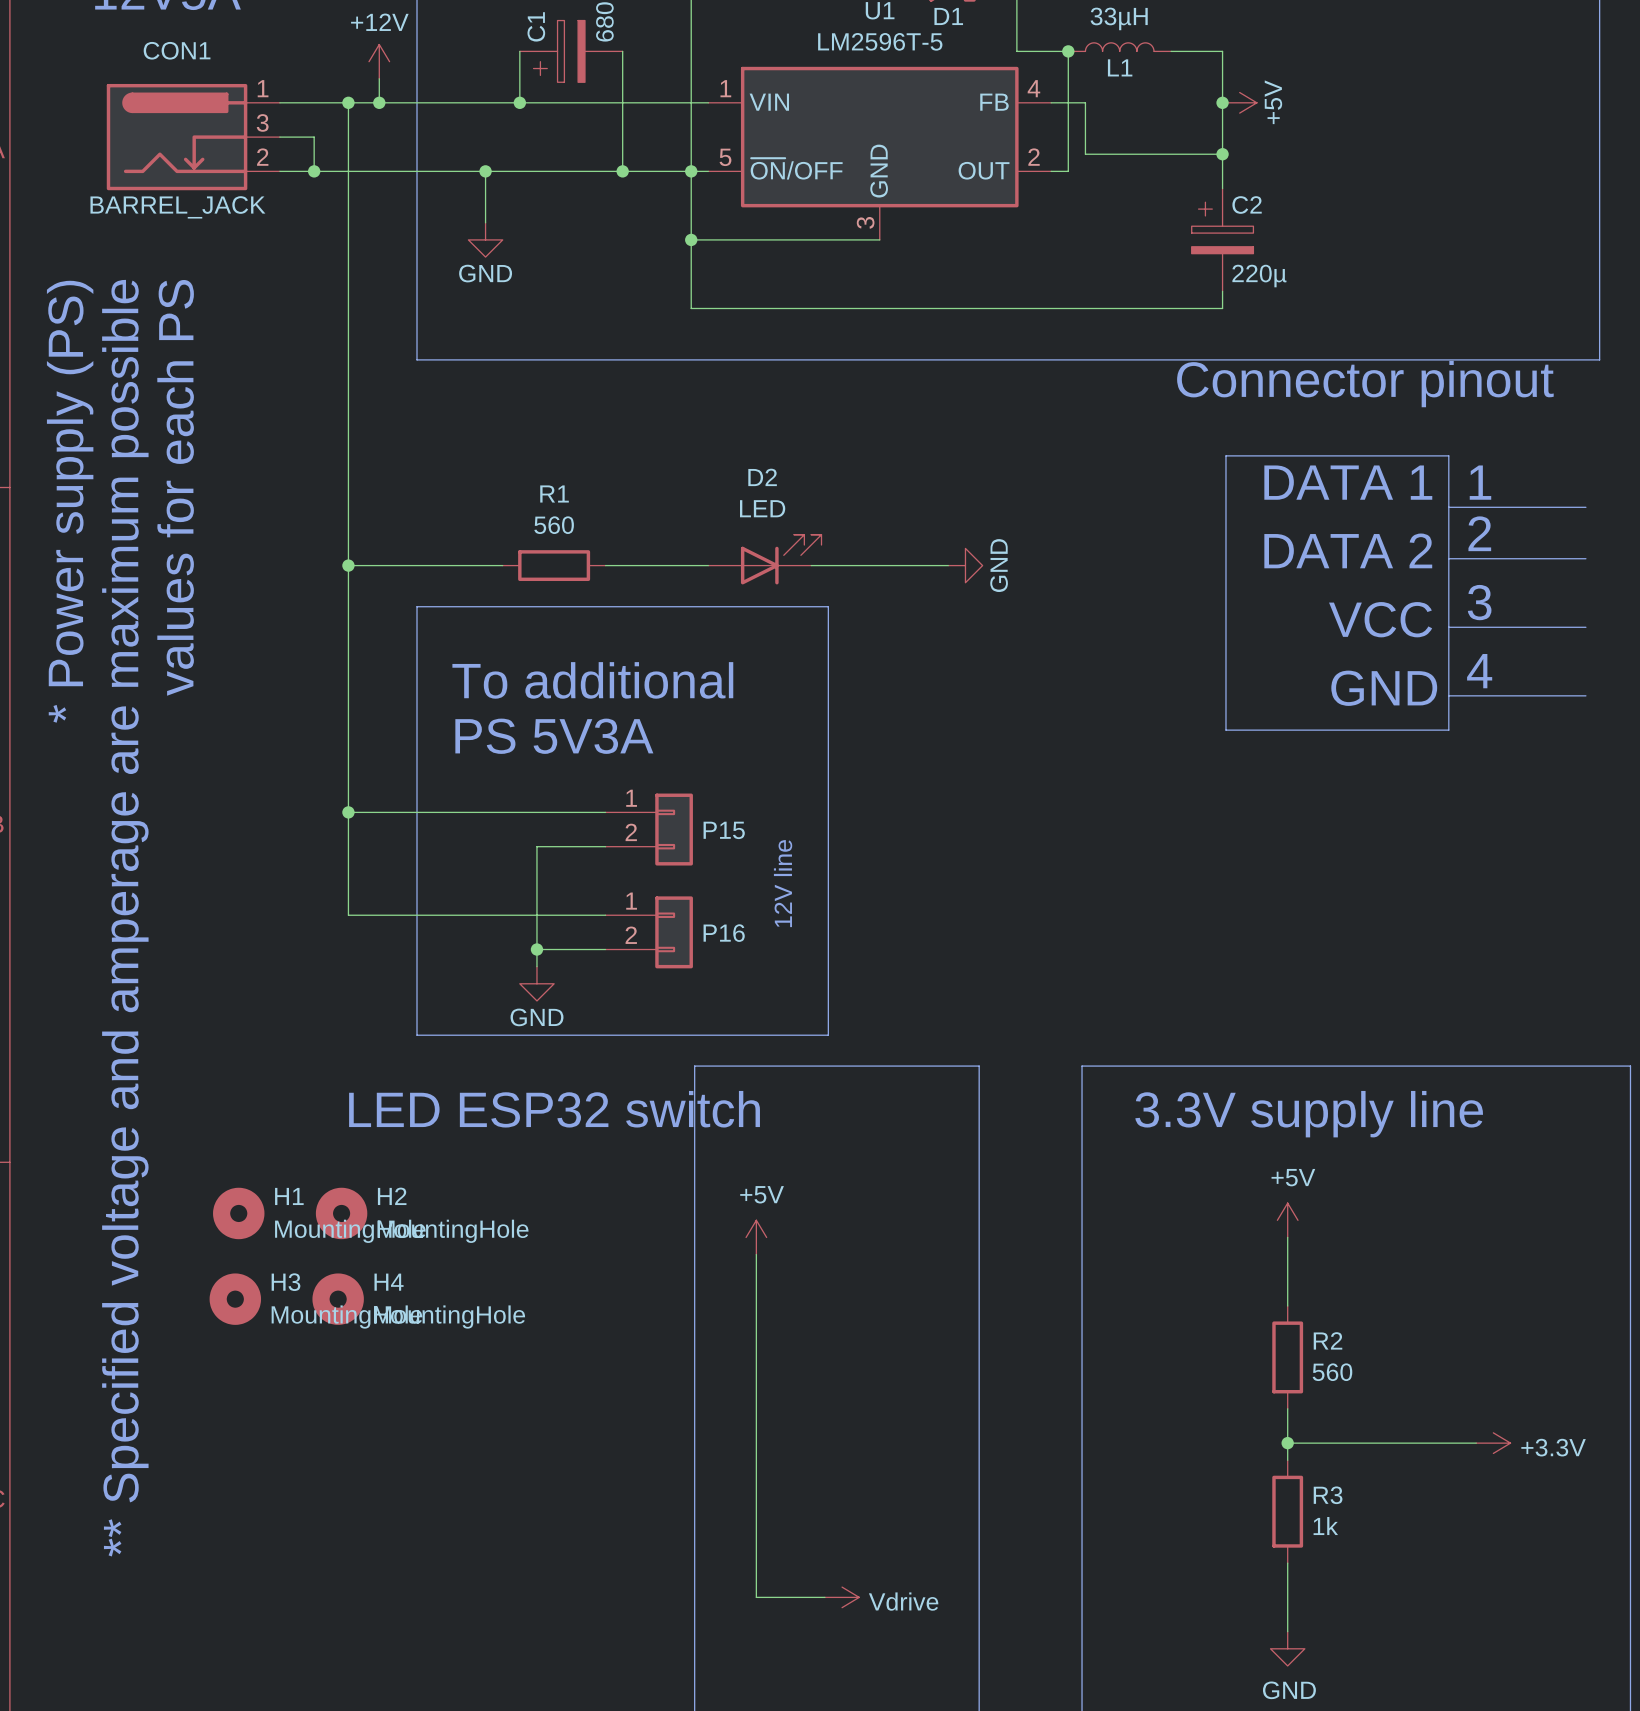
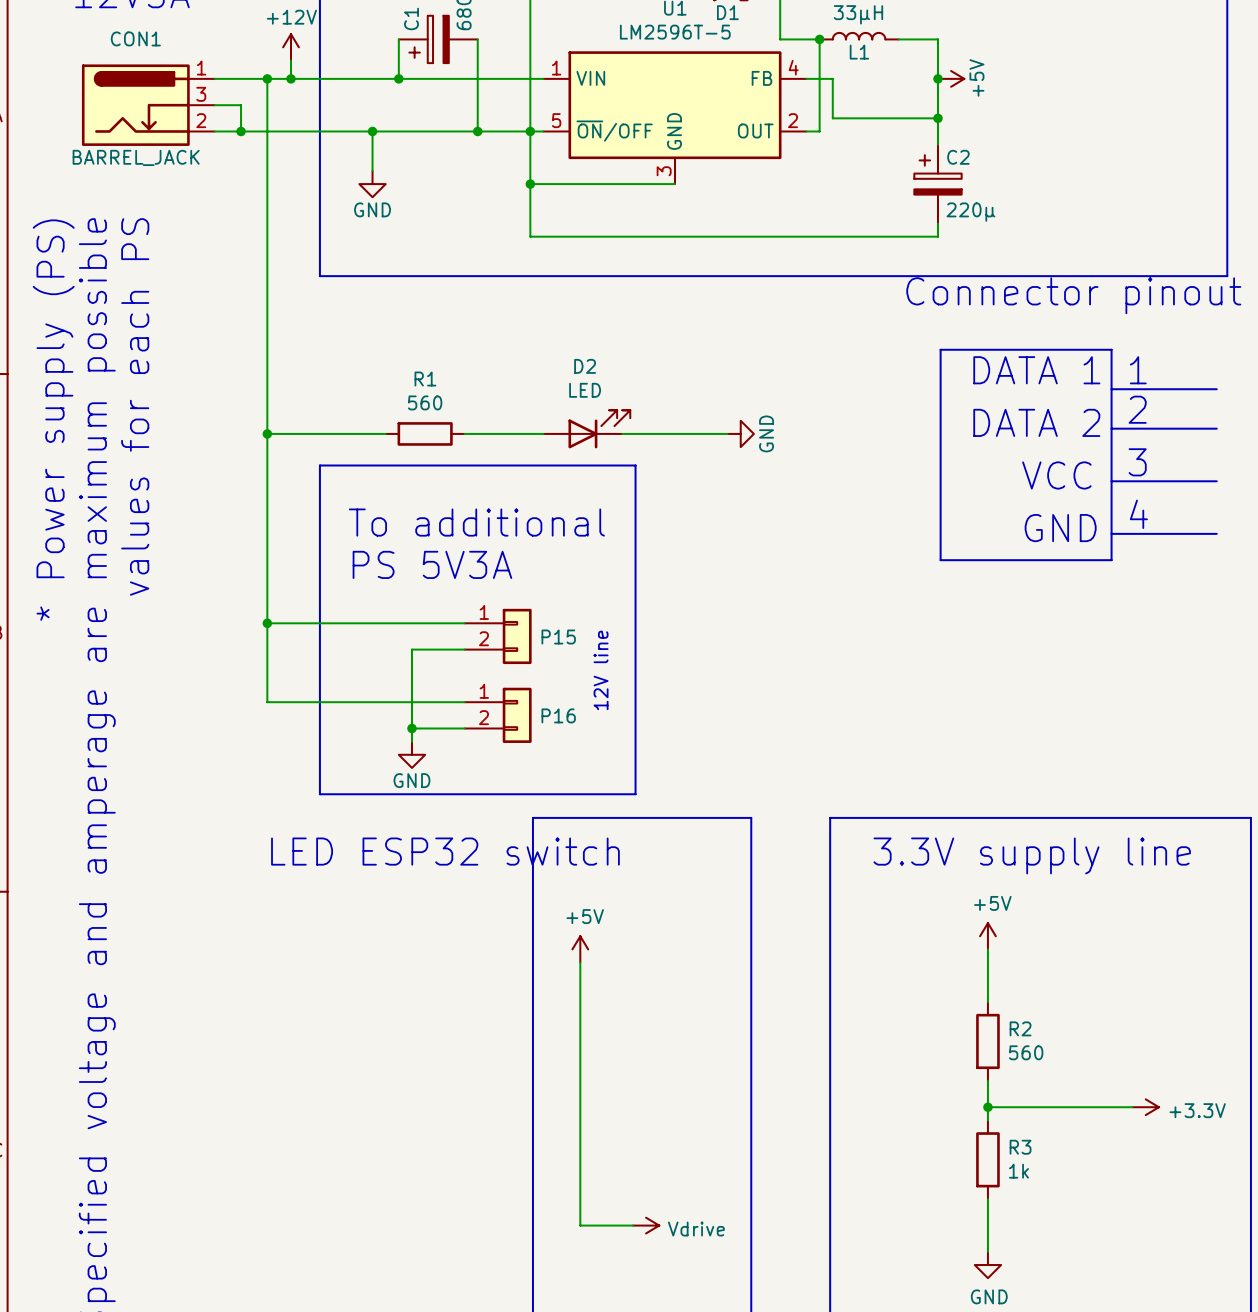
H1: MountingHole (238, 1213) -> none
H2: MountingHole (341, 1213) -> none
H3: MountingHole (235, 1299) -> none
H4: MountingHole (338, 1299) -> none

